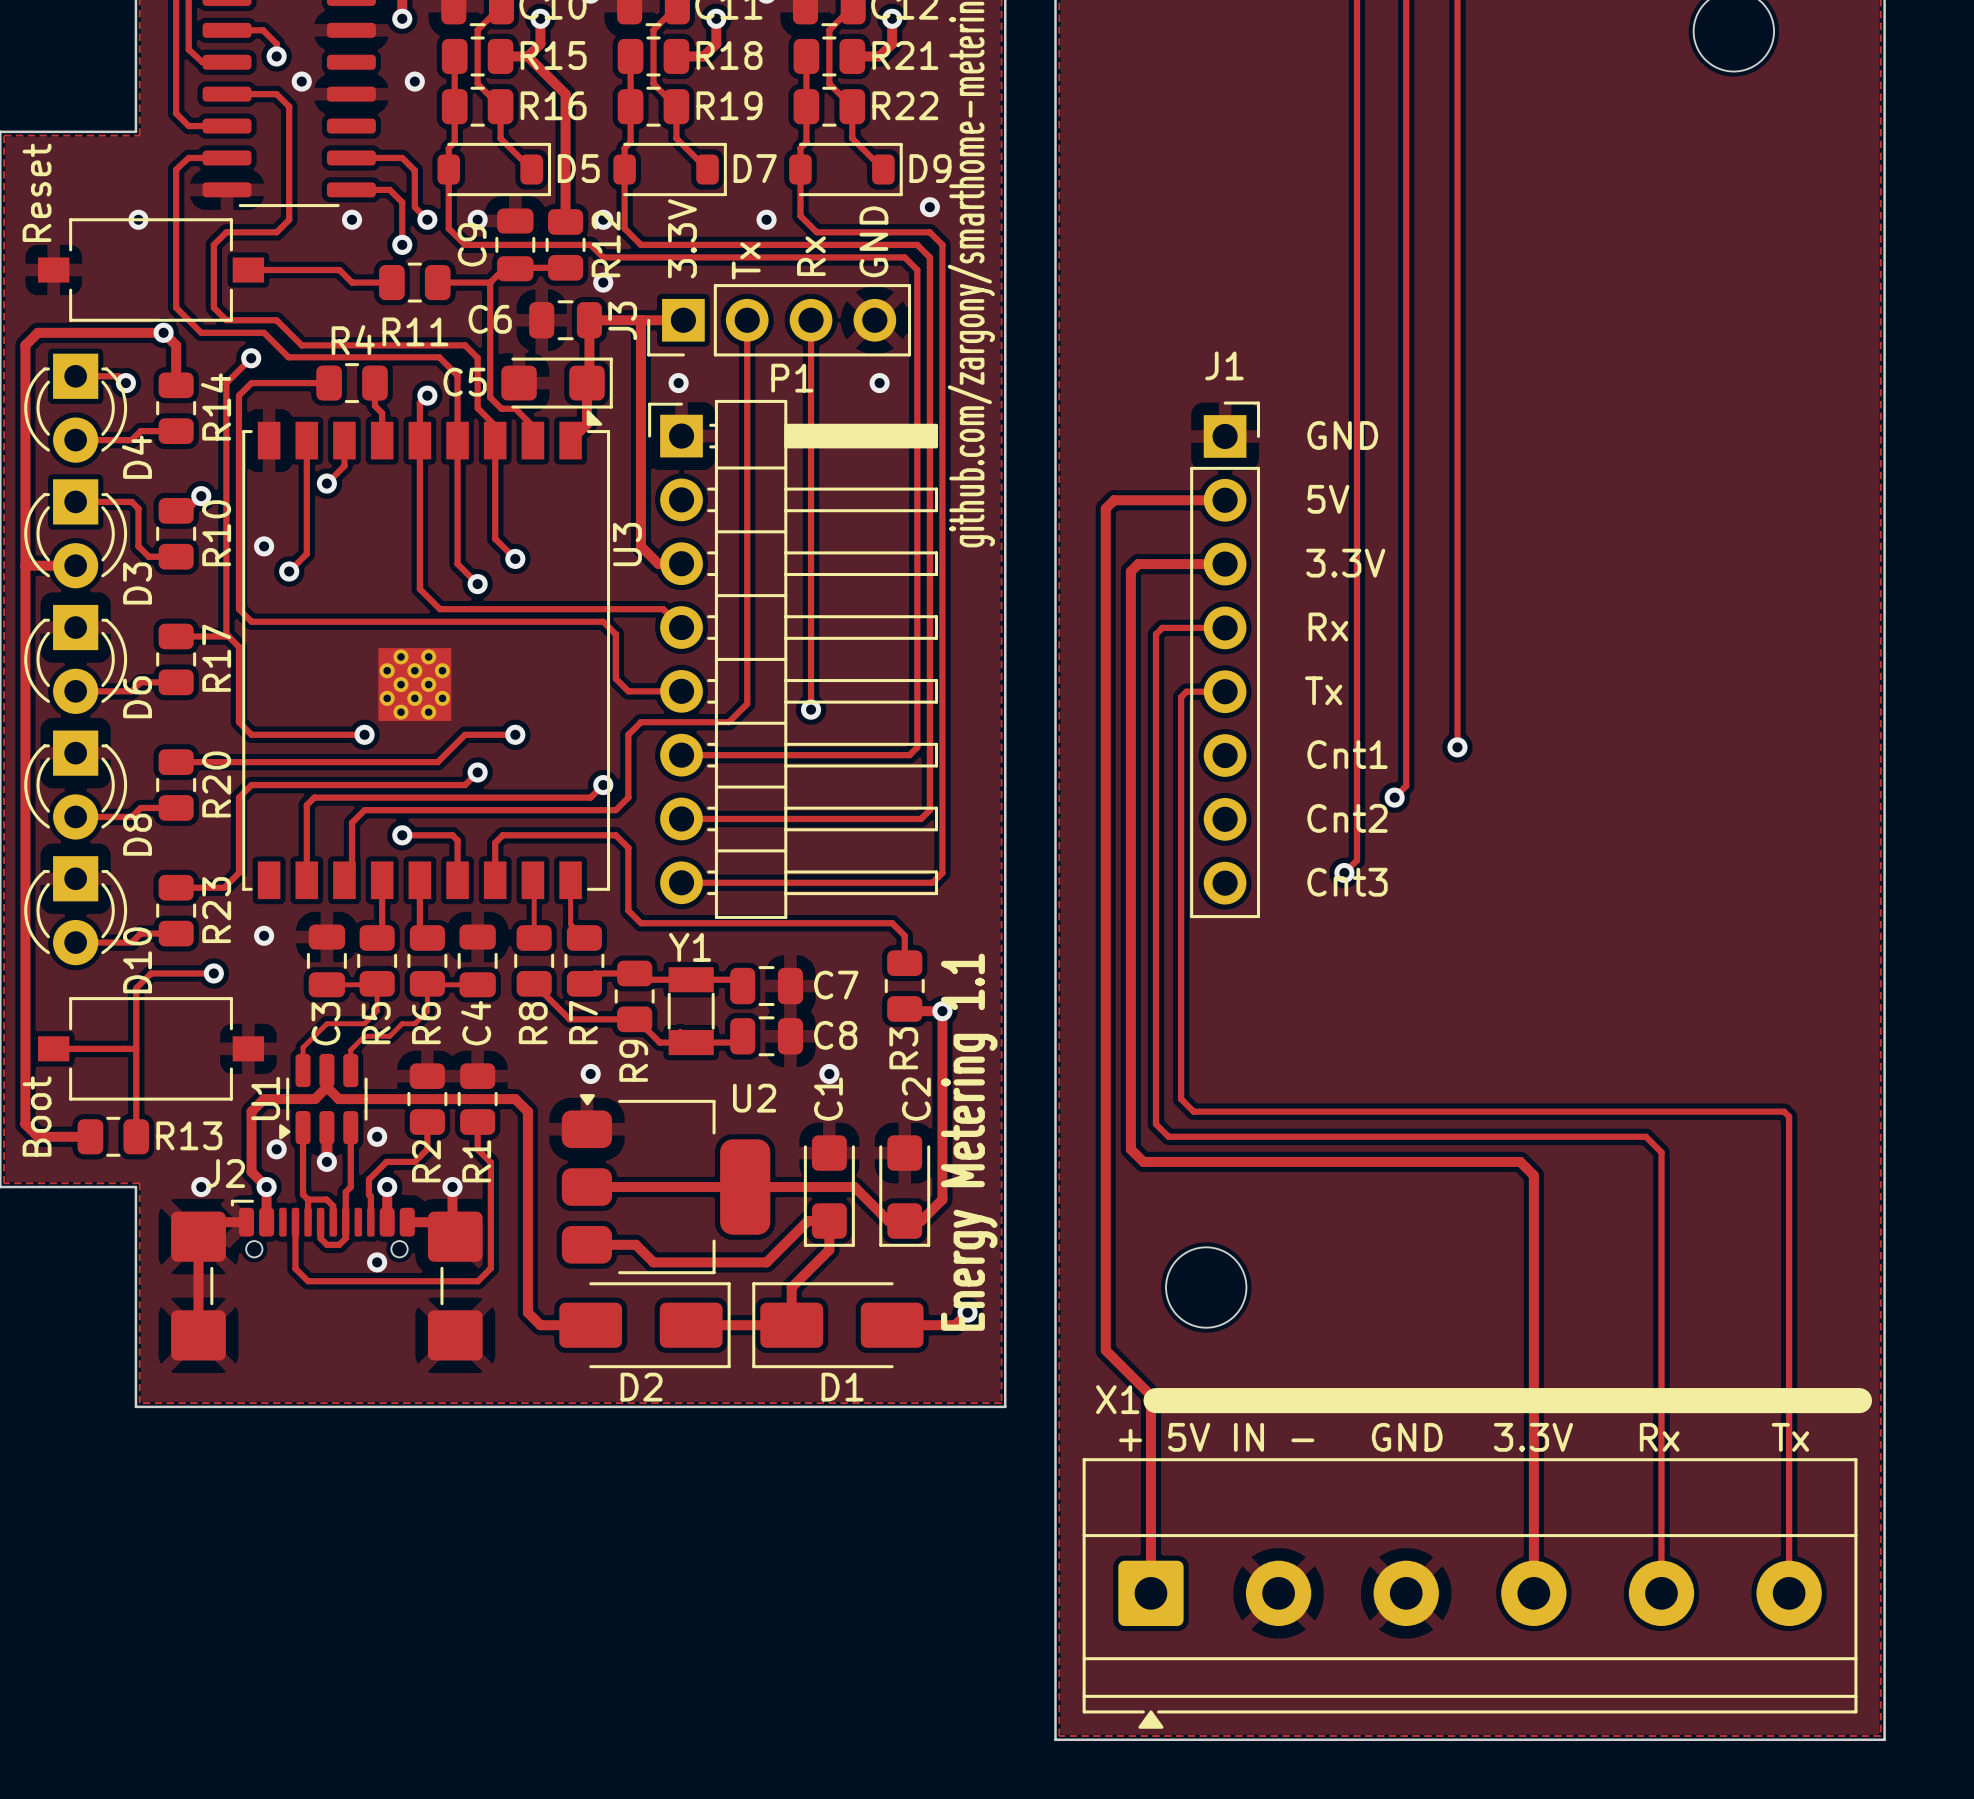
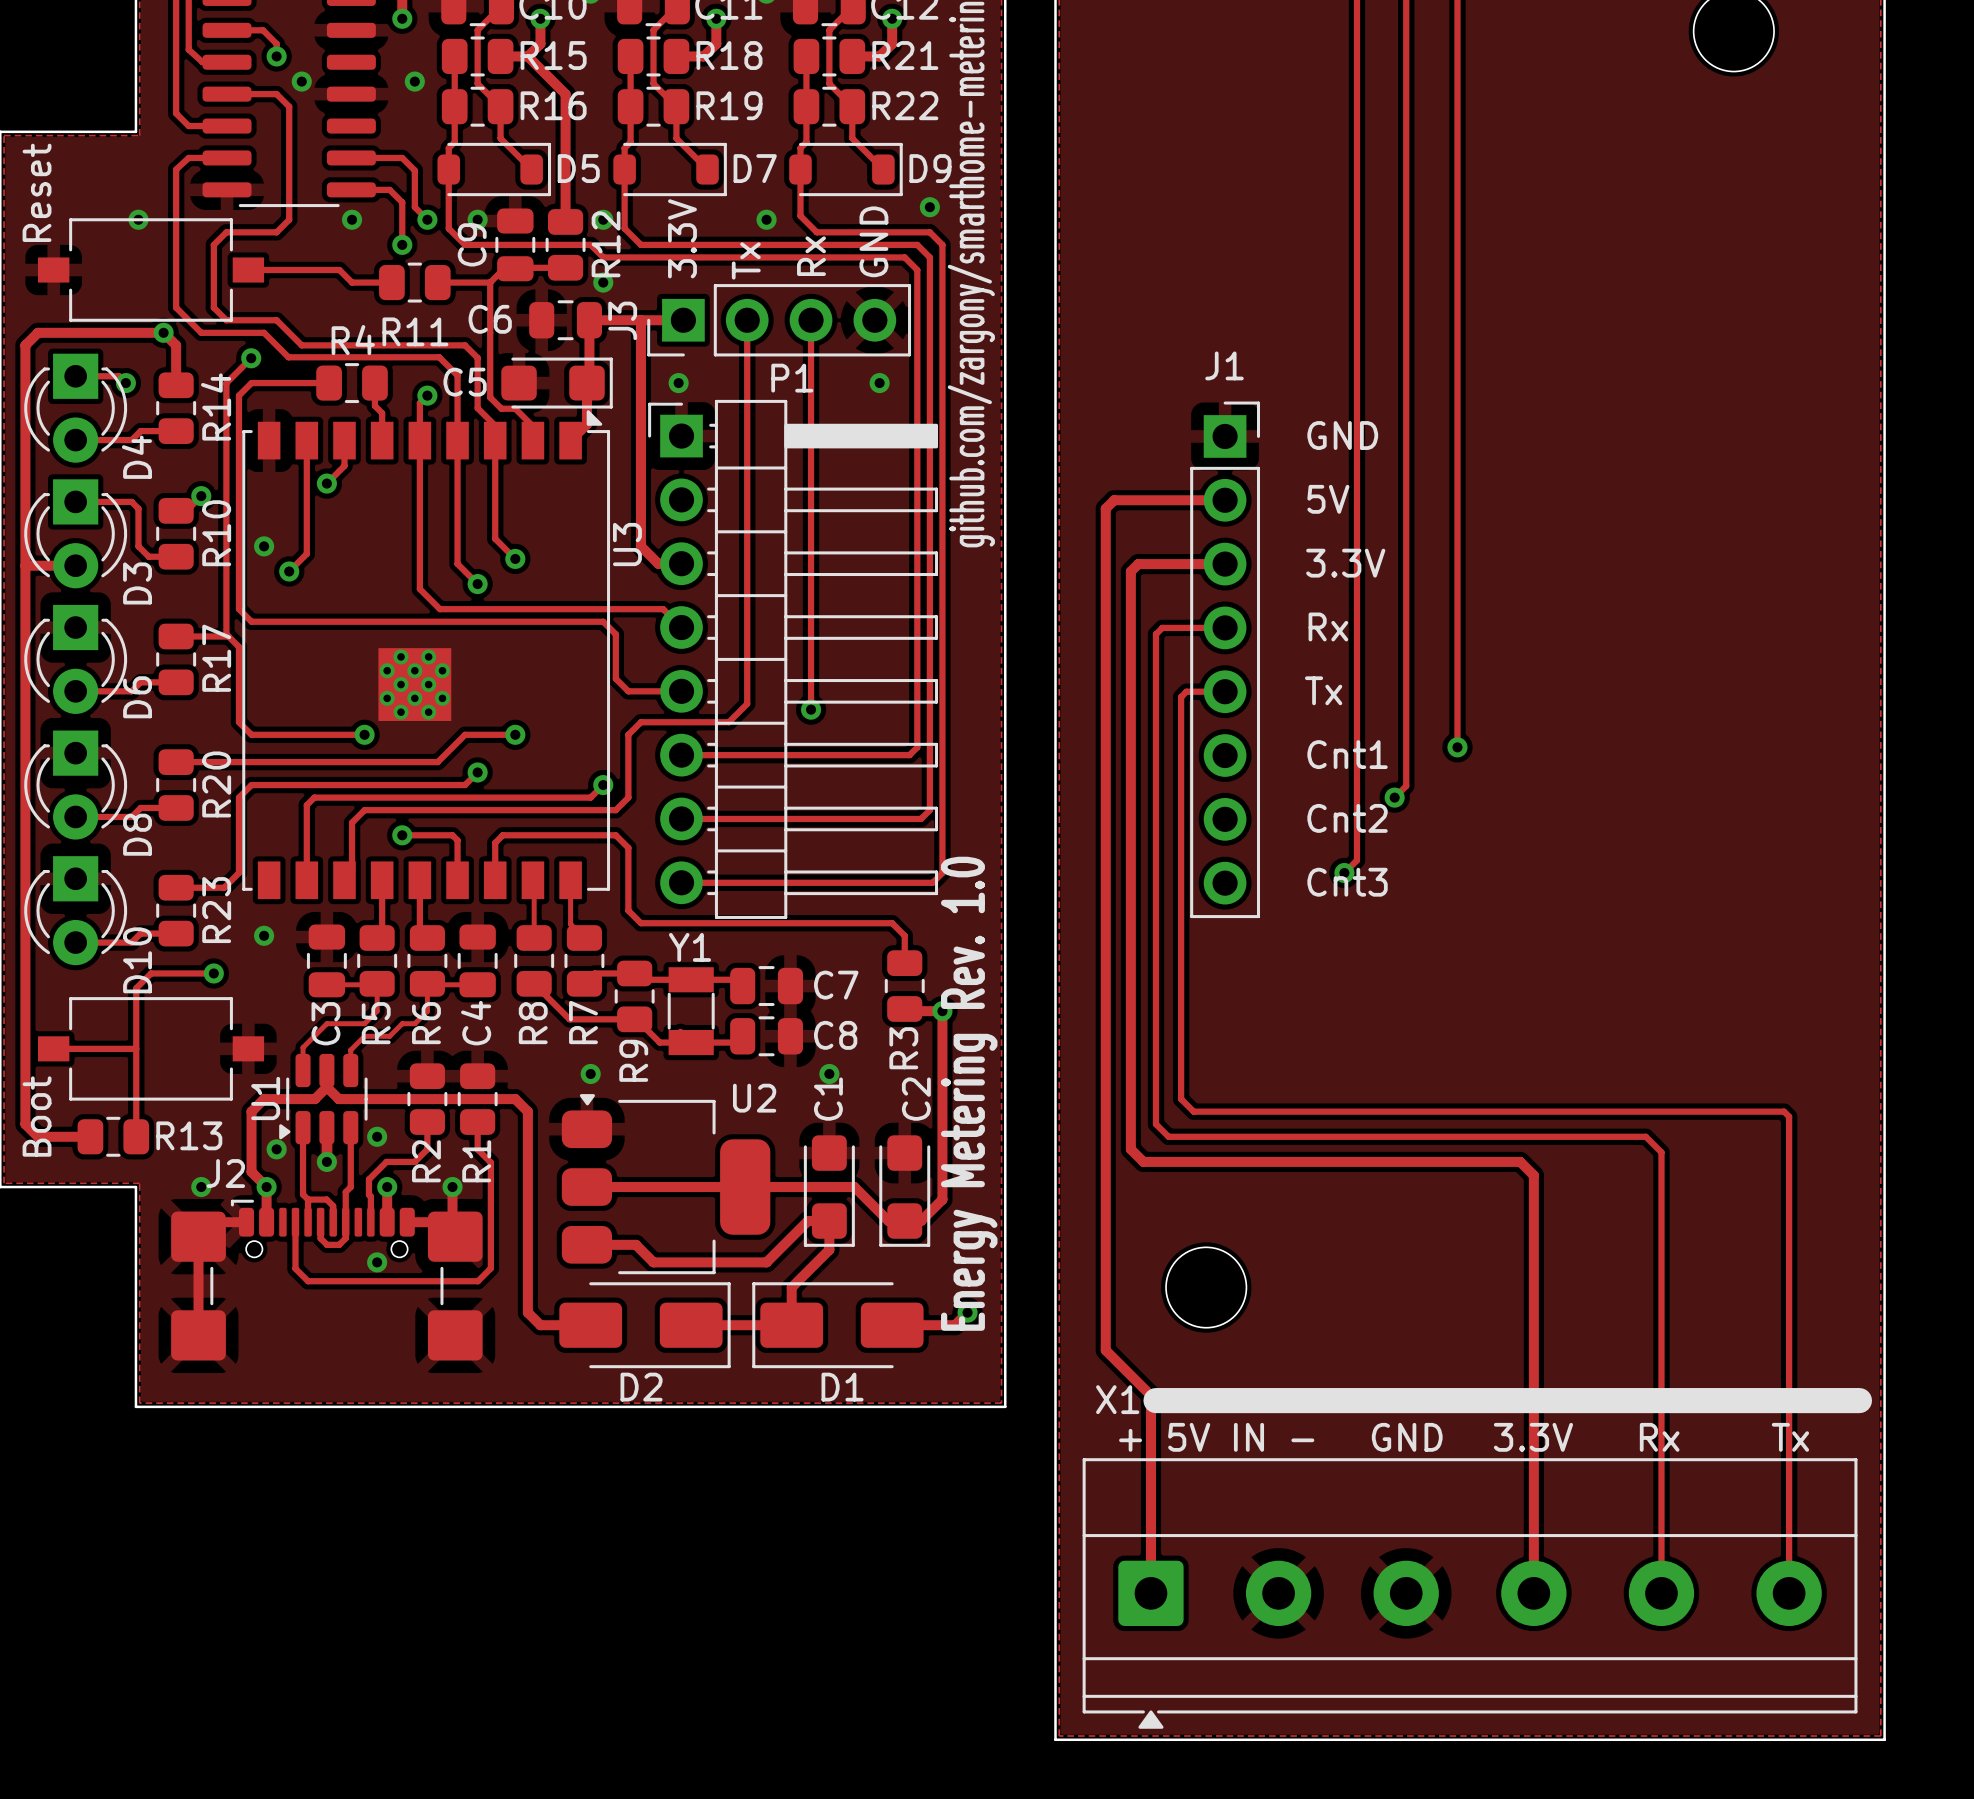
text: Energy Metering 1.1 (969, 1142) -> Energy Metering Rev. 1.0 (969, 1093)

